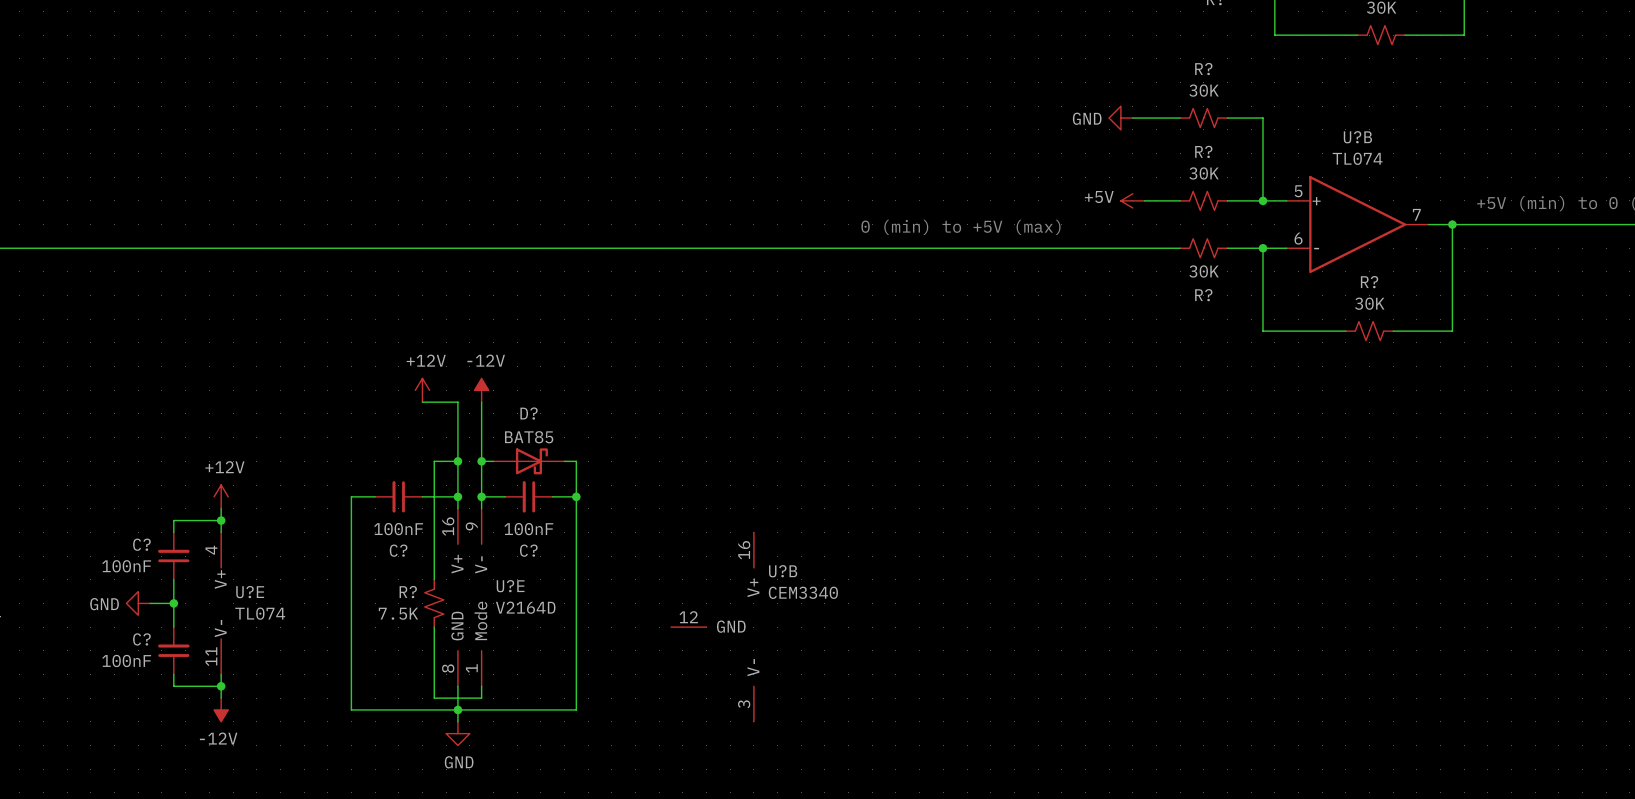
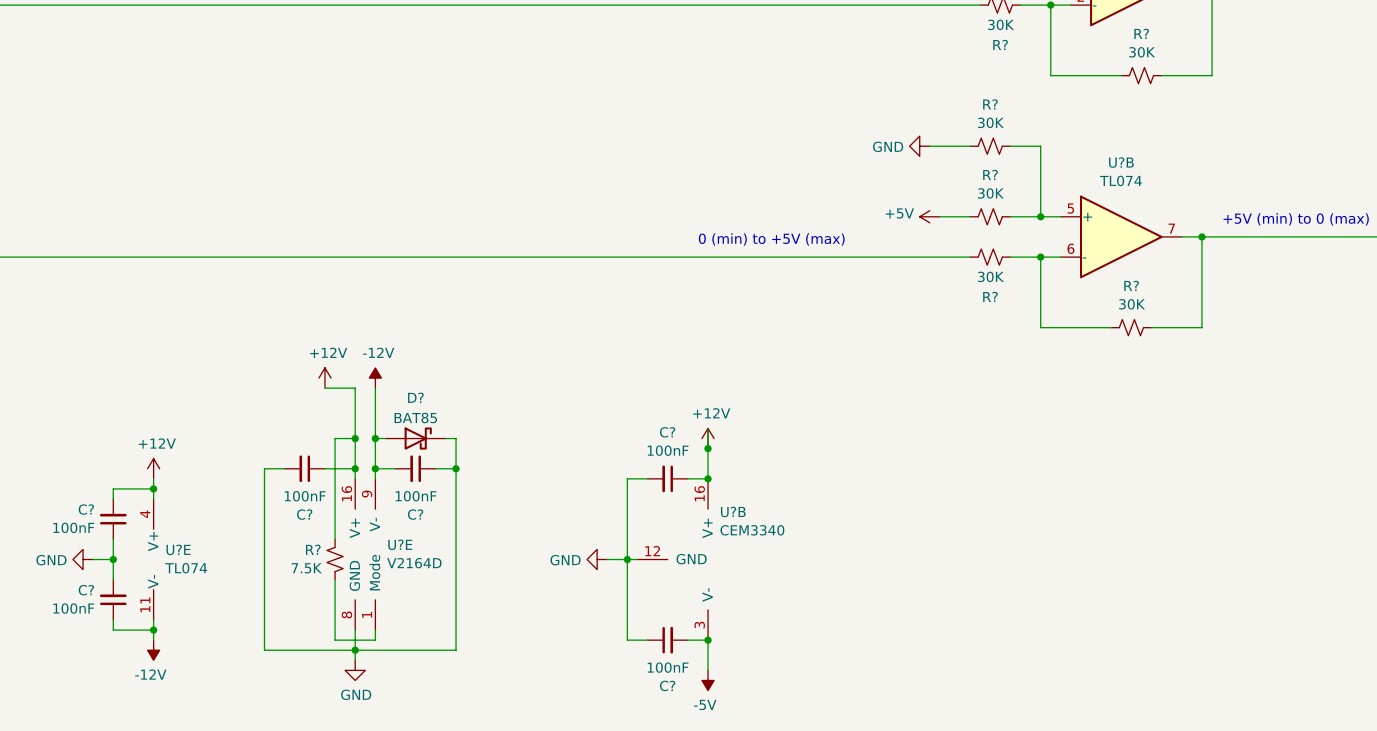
wire: none -> (708, 428) (708, 478) (687, 478)
power symbol: none -> +12V (708, 438)
junction: none -> (708, 448)
wire: none -> (647, 478) (627, 478) (627, 640) (647, 640)
C?: none -> 100nF (667, 478)
junction: none -> (708, 478)
power symbol: none -> GND (597, 559)
wire: none -> (607, 559) (637, 559)
junction: none -> (627, 559)
U?B position: (712, 627) -> (672, 559)
C?: none -> 100nF (667, 640)
wire: none -> (687, 640) (708, 640) (708, 670)
junction: none -> (708, 640)
power symbol: none -> -5V (708, 680)

